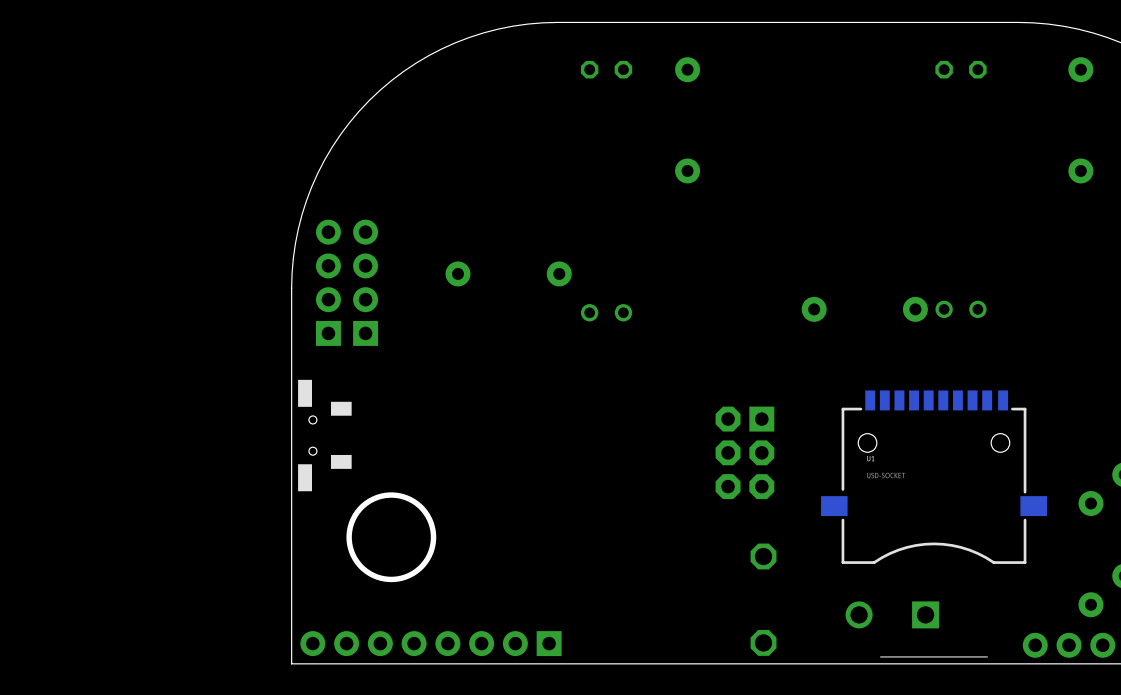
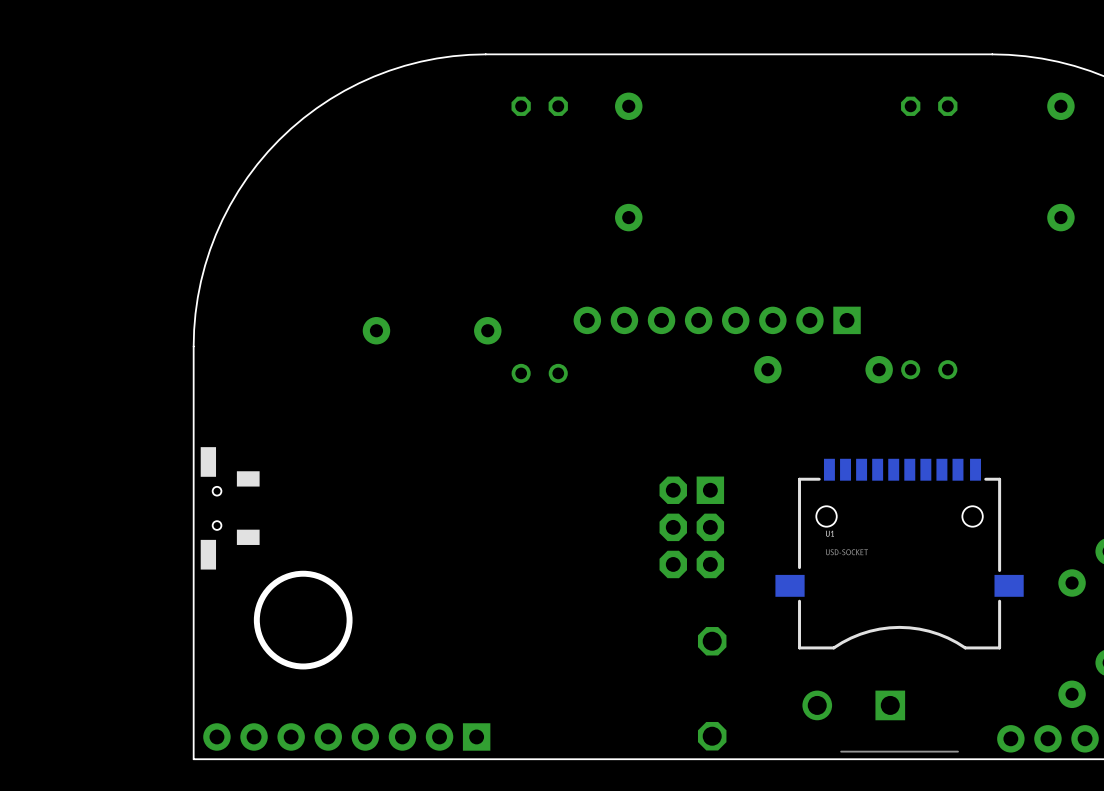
part: none -> (717, 320)
part: (328, 282) -> none
part: (365, 282) -> none

